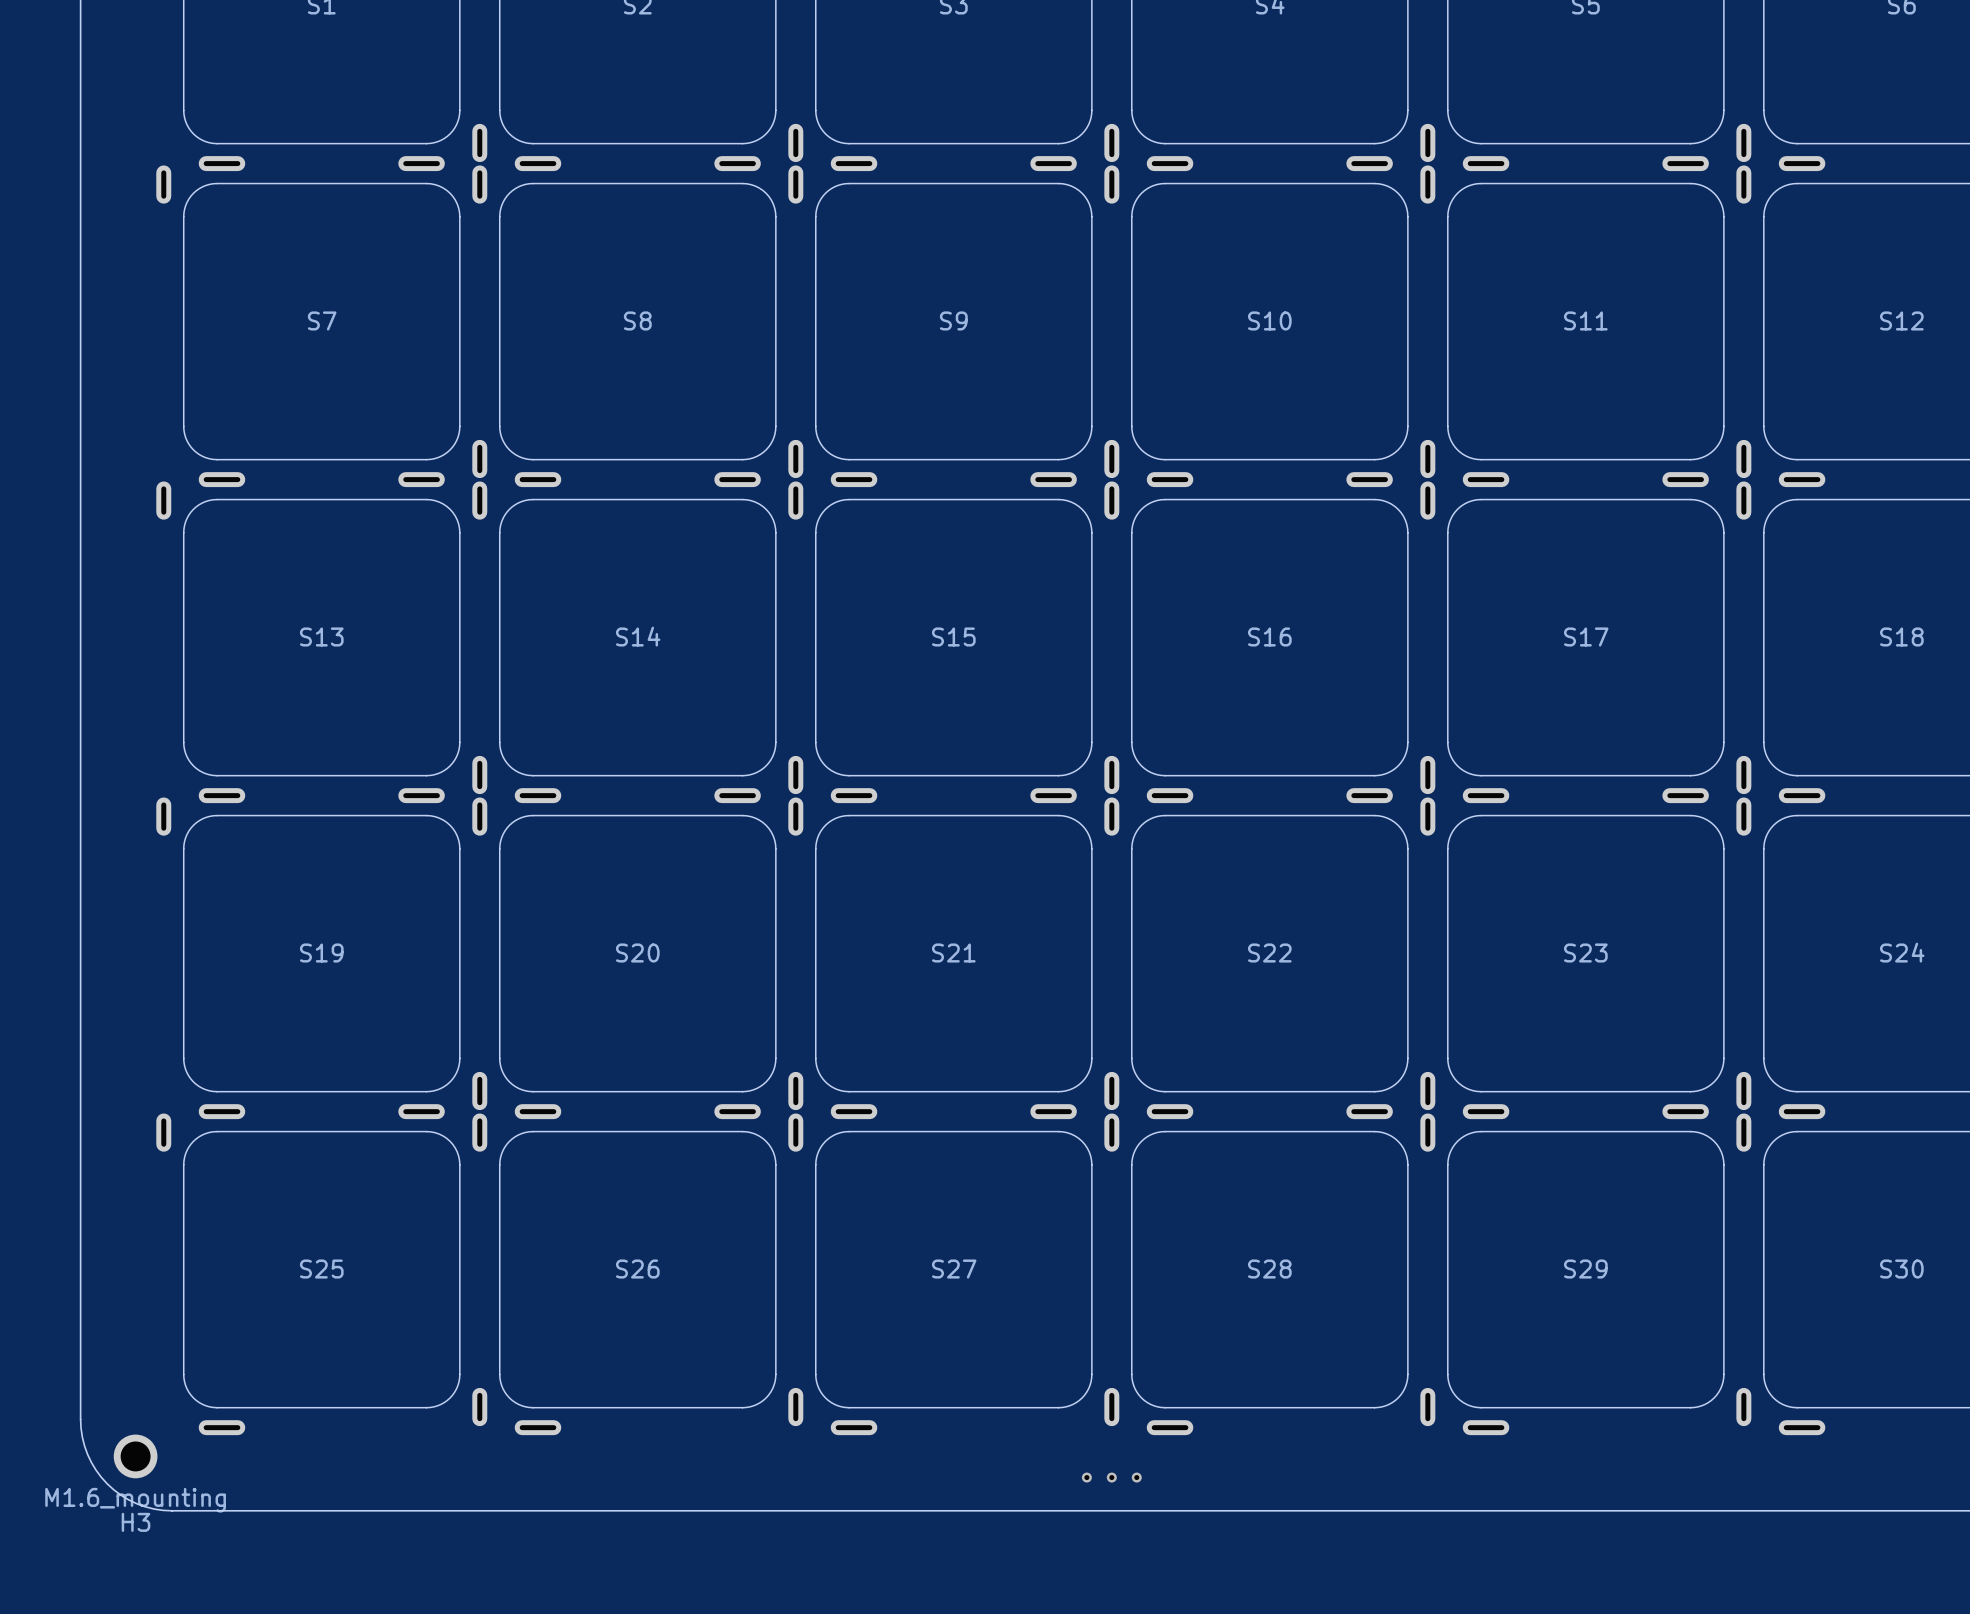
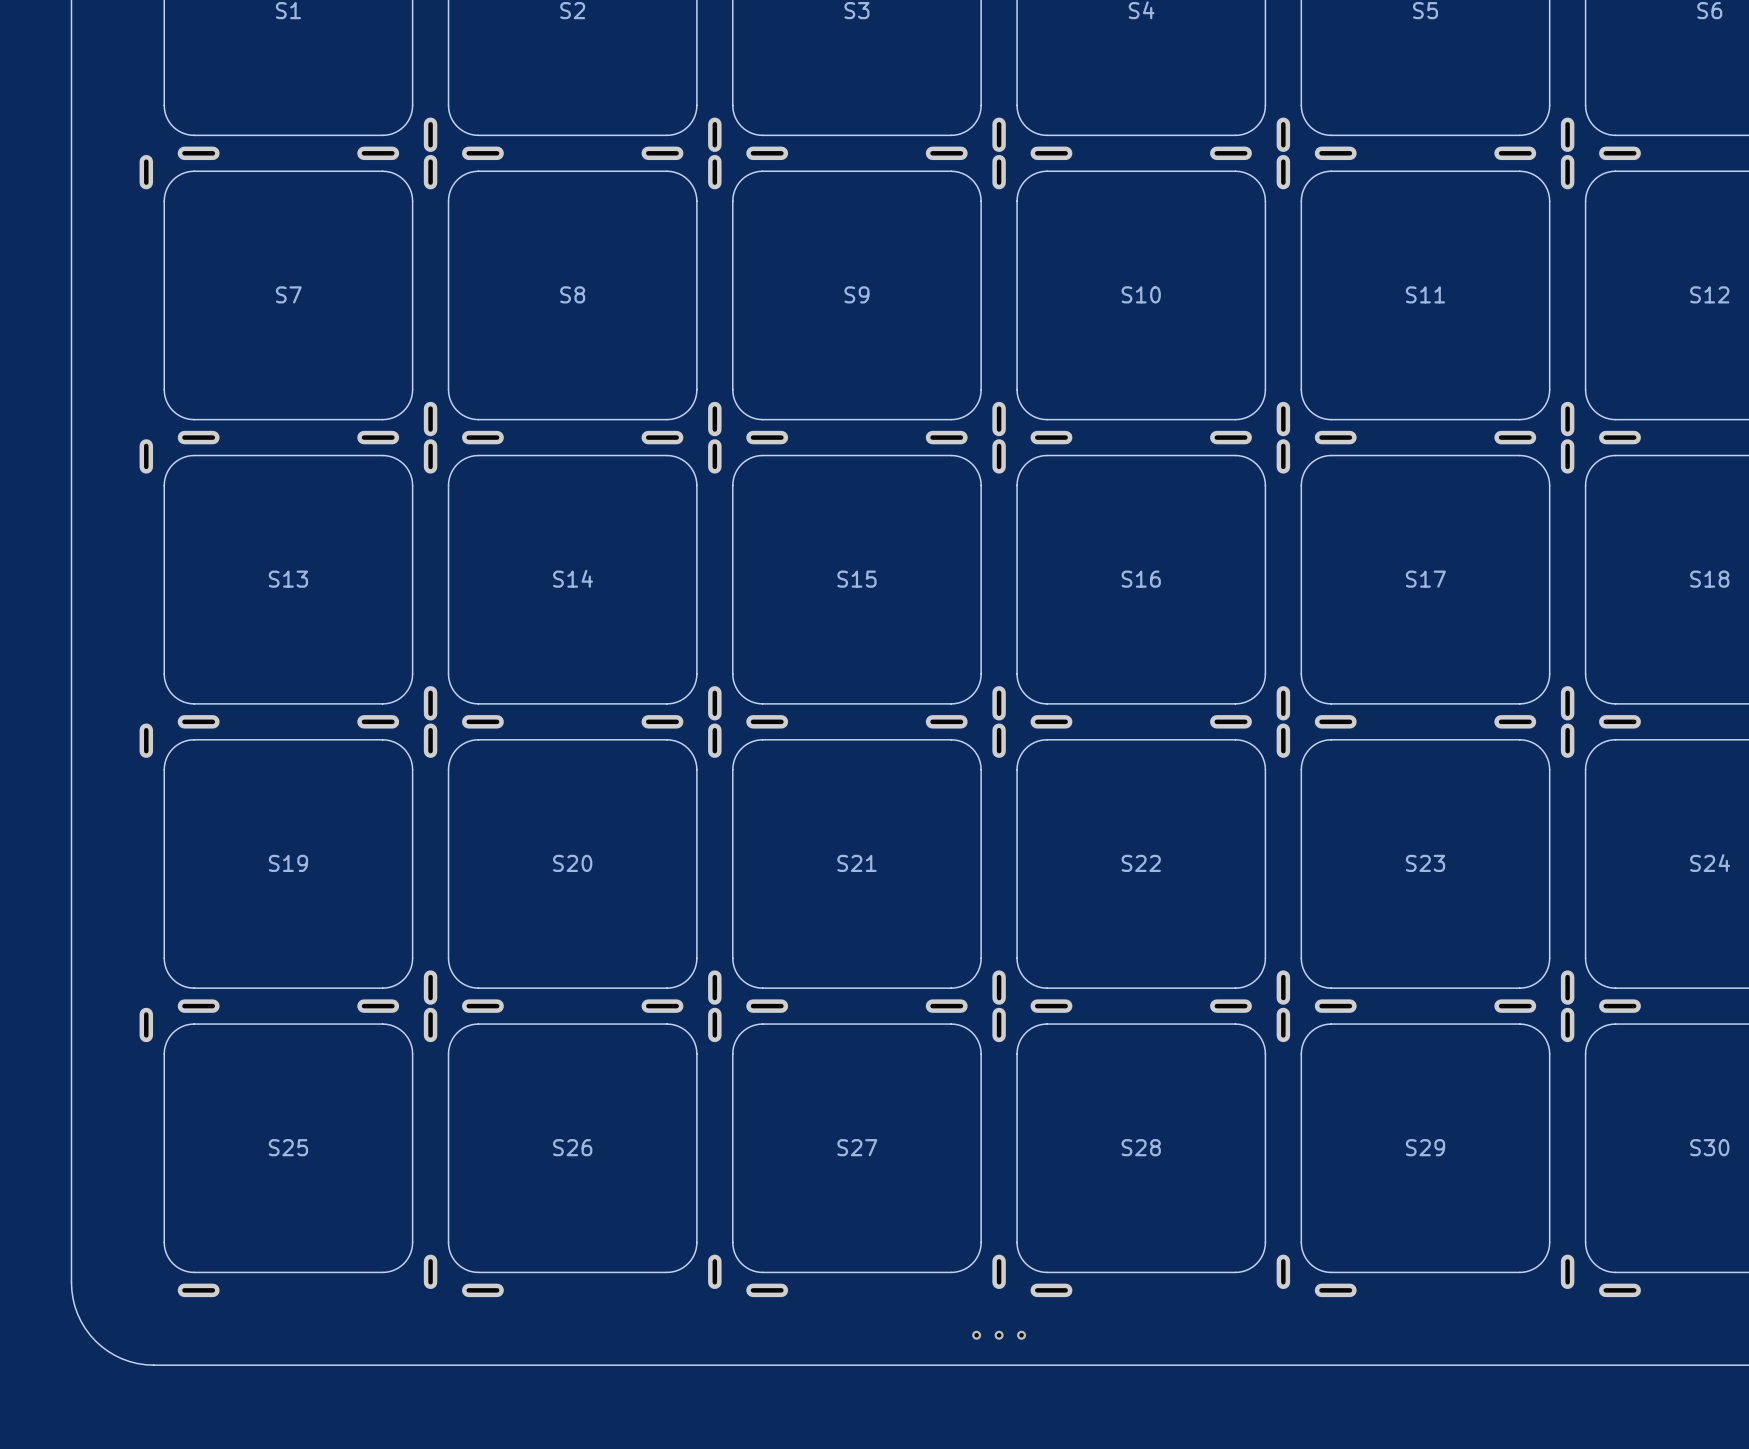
H3: M1.6_mounting (135, 1456) -> none

